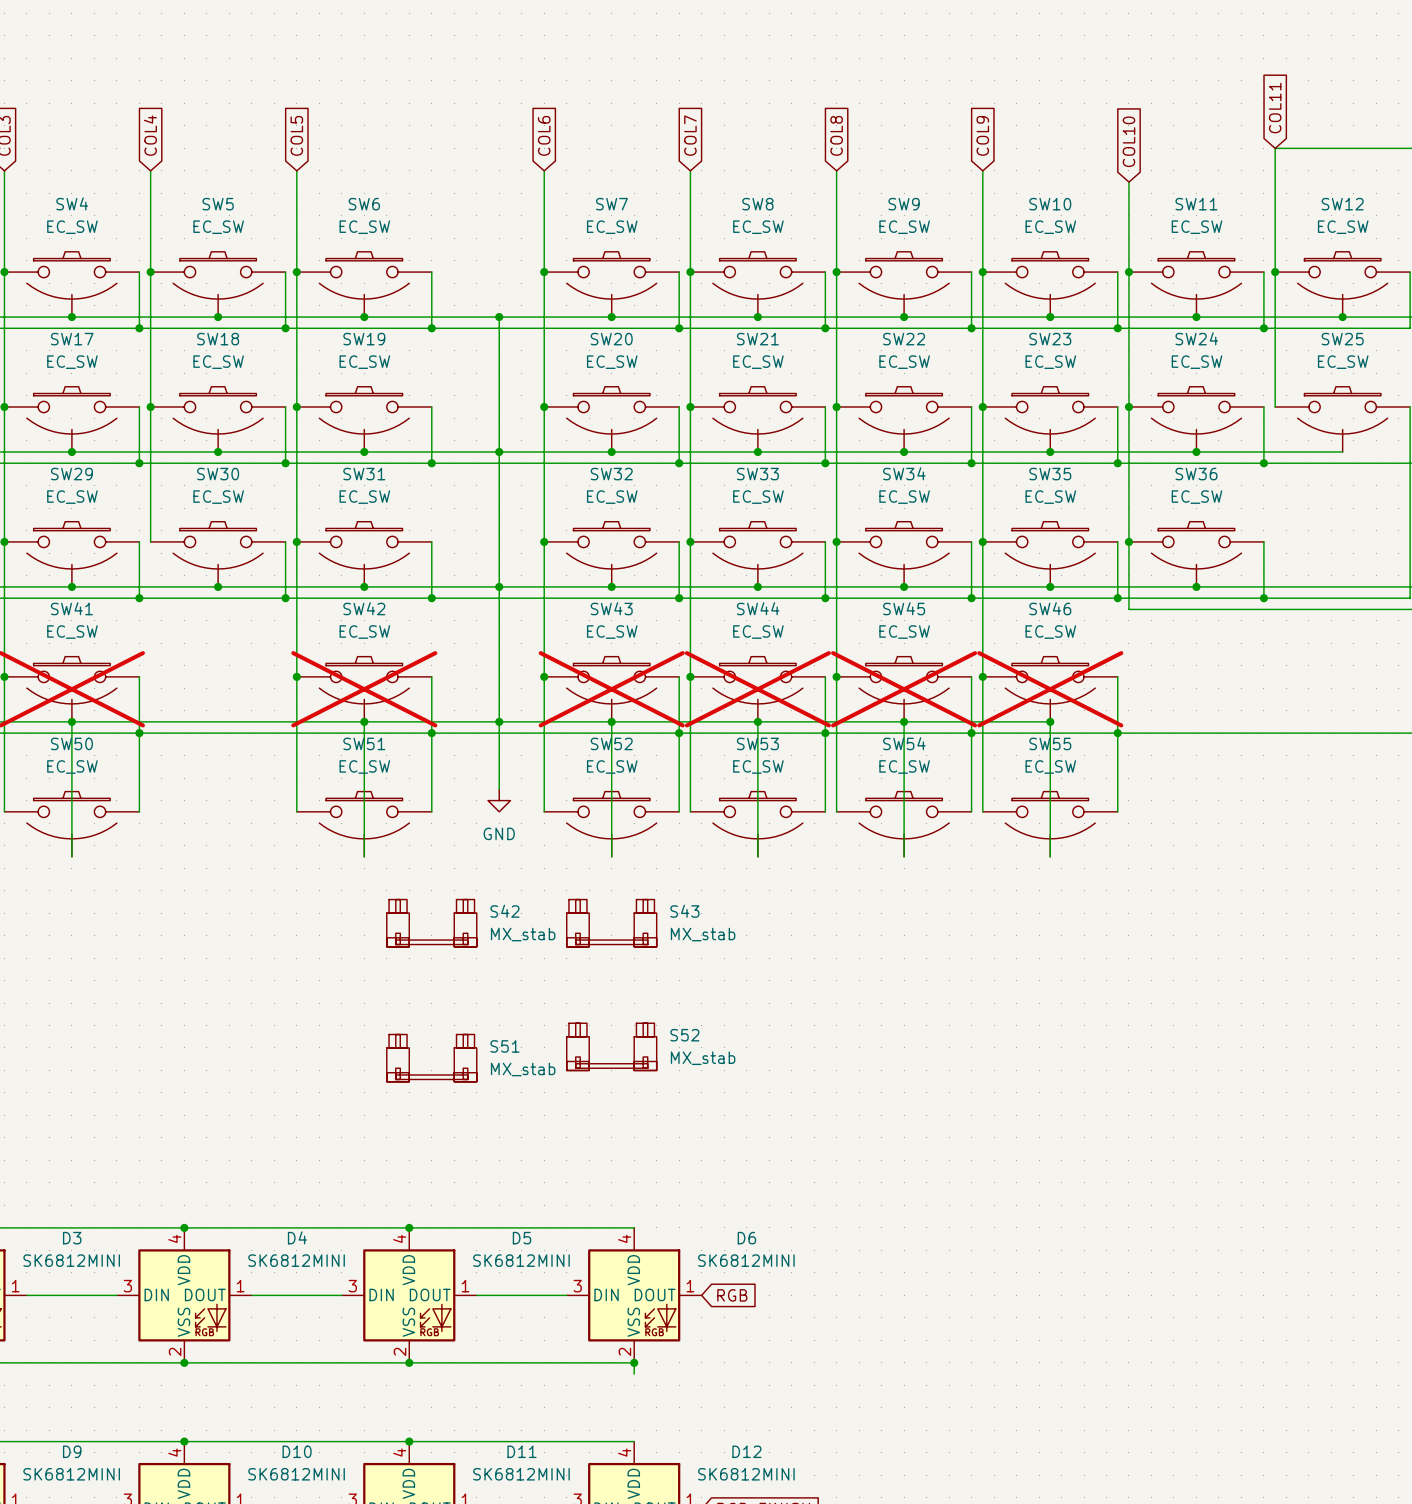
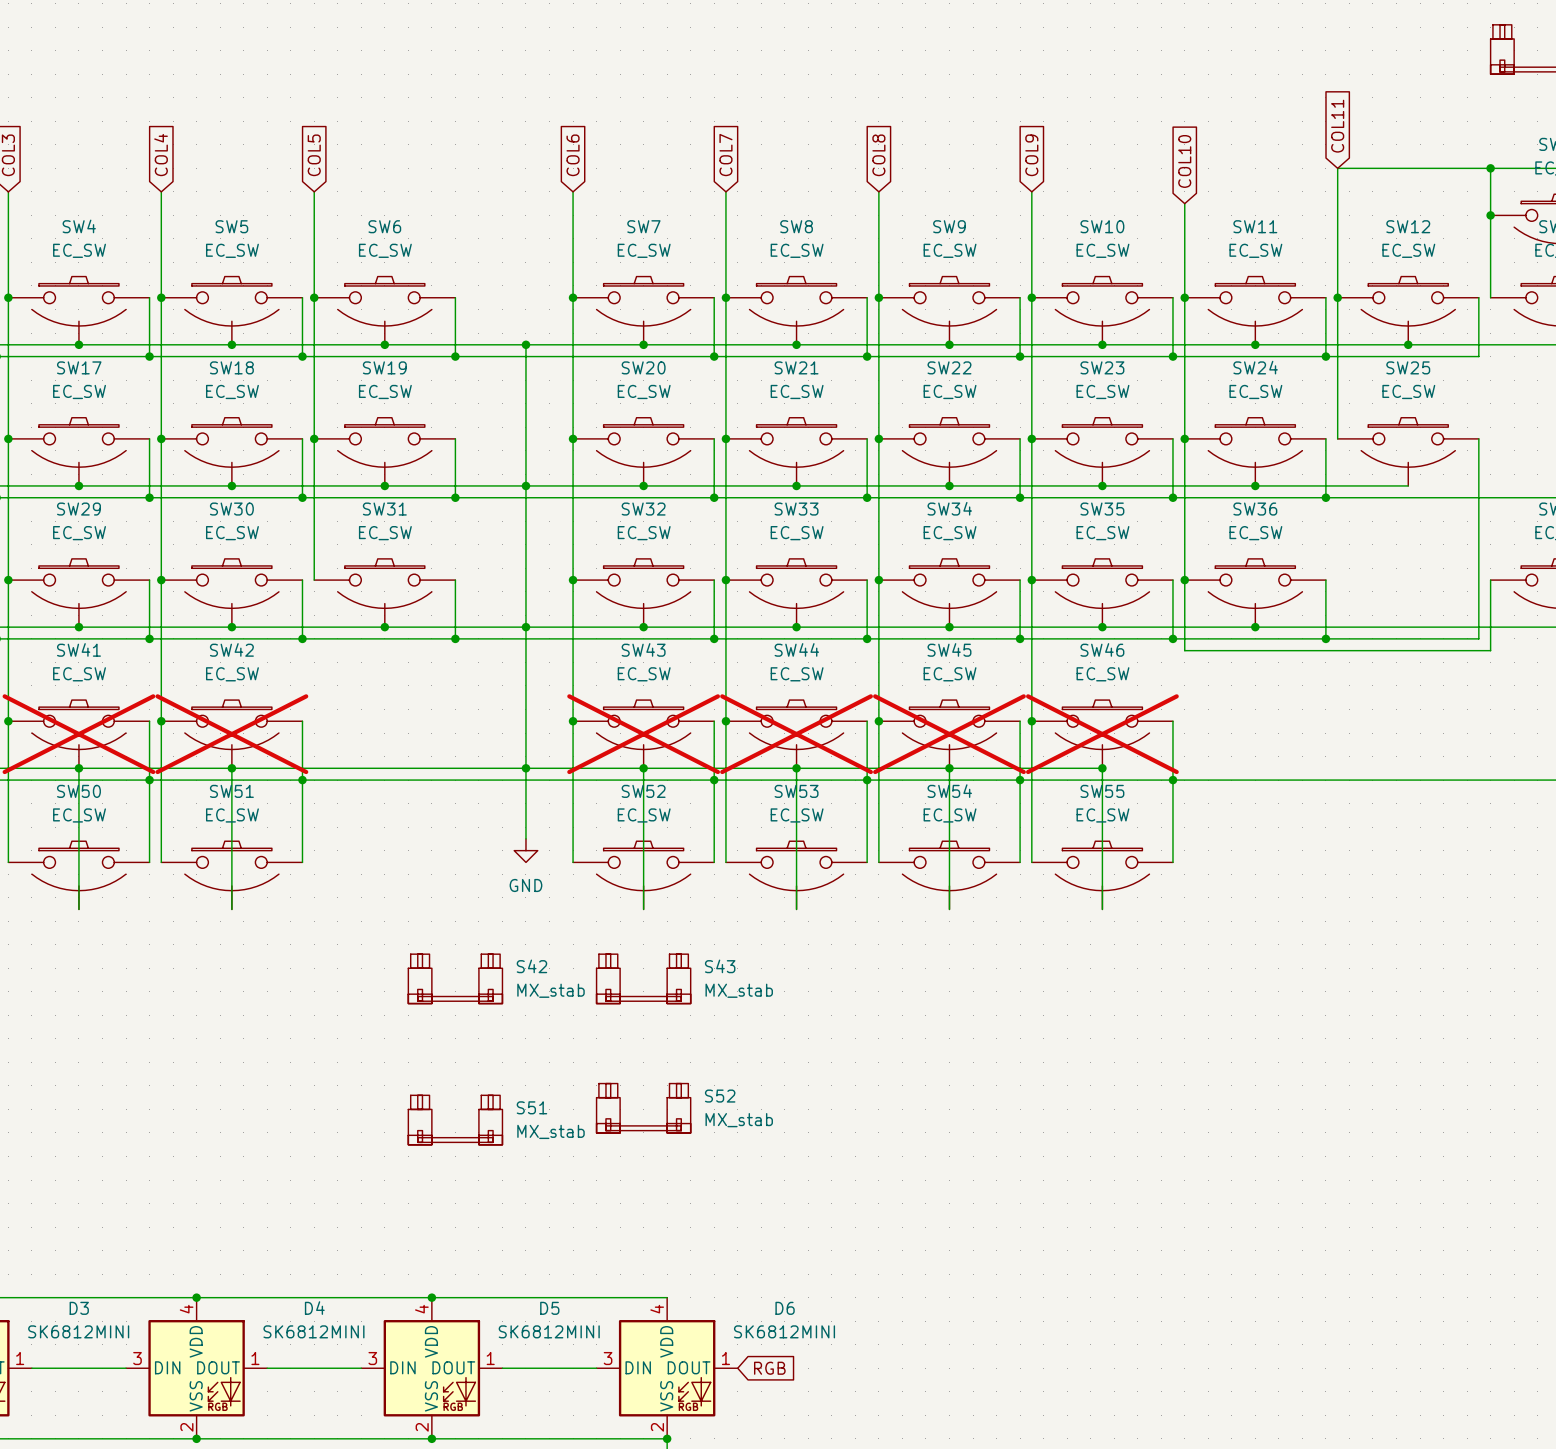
junction: none -> (161, 580)
wire: (296, 541) (296, 811) -> (161, 580) (161, 862)
junction: (296, 541) -> none
junction: none -> (161, 721)
junction: (296, 676) -> none
wire: (431, 676) (431, 811) -> (302, 721) (302, 862)
SW42 position: (364, 689) -> (231, 734)
junction: none -> (231, 768)
wire: (364, 721) (364, 856) -> (231, 768) (231, 909)
junction: (364, 721) -> none
junction: none -> (302, 780)
junction: (431, 733) -> none
SW51 position: (364, 824) -> (231, 875)

